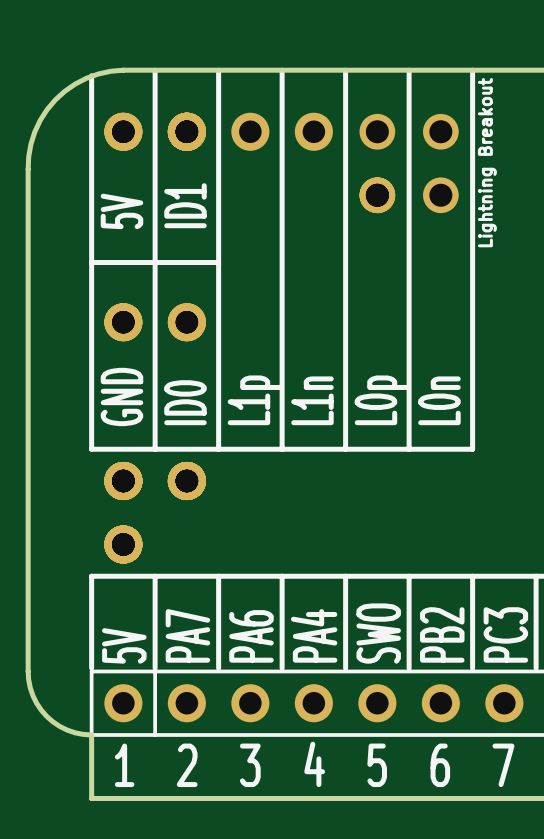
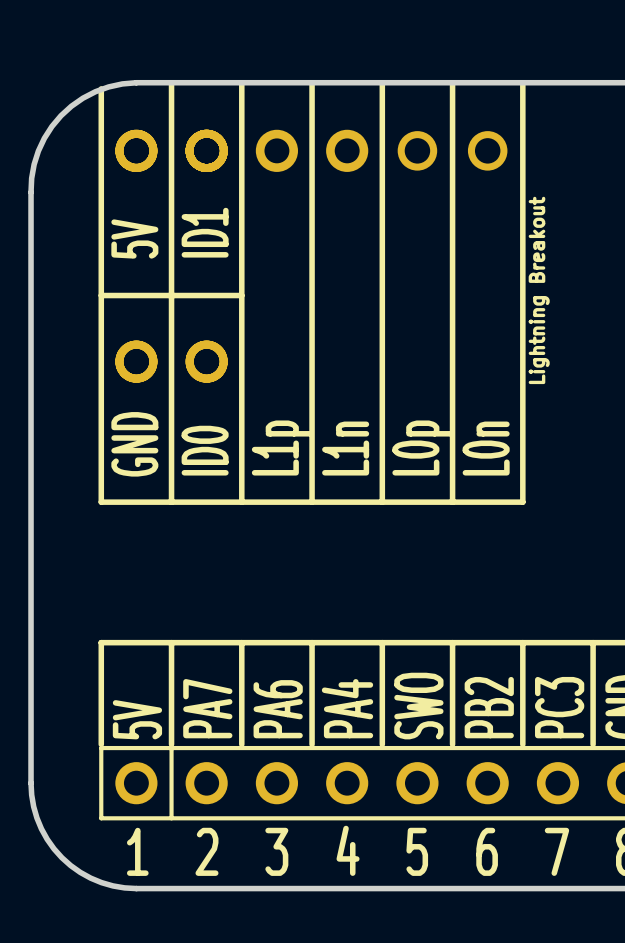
text position: Lightning Breakout (487, 162) -> Lightning Breakout (539, 290)
part: (377, 195) -> none
part: (440, 195) -> none
part: (123, 481) -> none
part: (186, 481) -> none
part: (123, 544) -> none
board edge: (28, 671) (32, 695) (46, 716) (67, 730) (91, 734) -> (31, 748) (31, 783) (33, 806) (41, 828) (54, 848) (70, 865) (90, 878) (112, 885) (136, 888)
board edge: (91, 737) (91, 798) (123, 798) -> none

